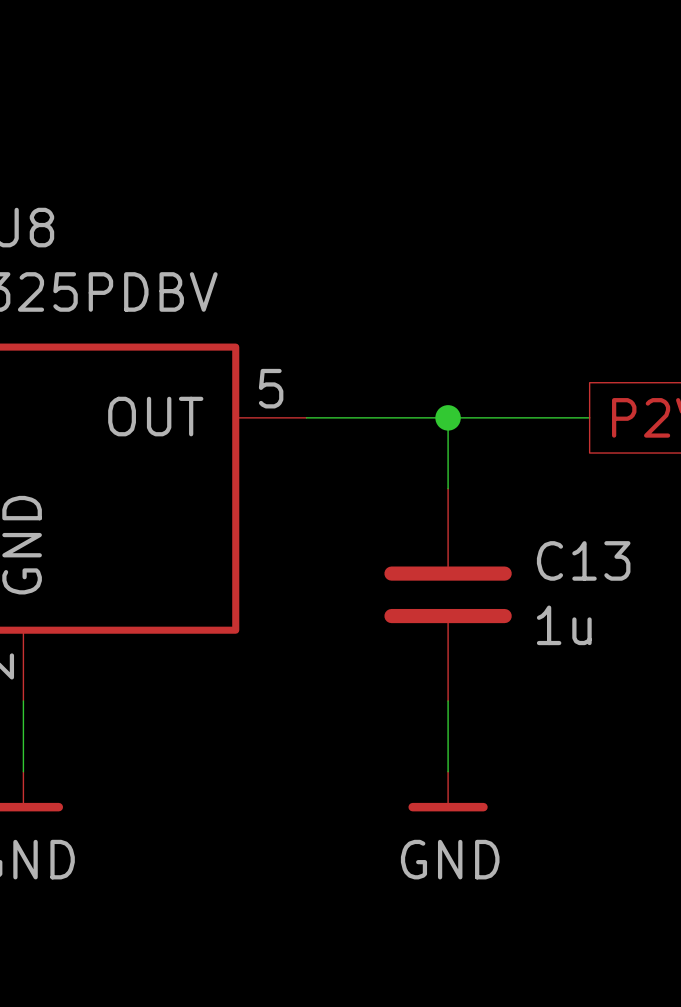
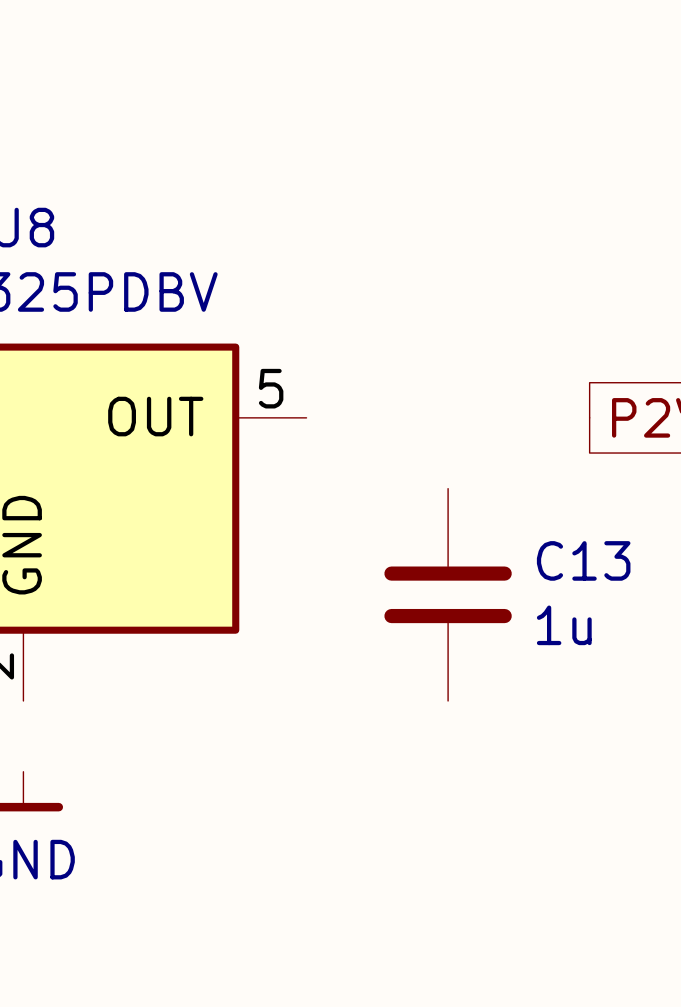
wire: (306, 417) (589, 417) -> none
wire: (448, 417) (448, 488) -> none
junction: (448, 417) -> none
wire: (23, 700) (23, 771) -> none
wire: (448, 700) (448, 771) -> none
power symbol: GND (448, 791) -> none

